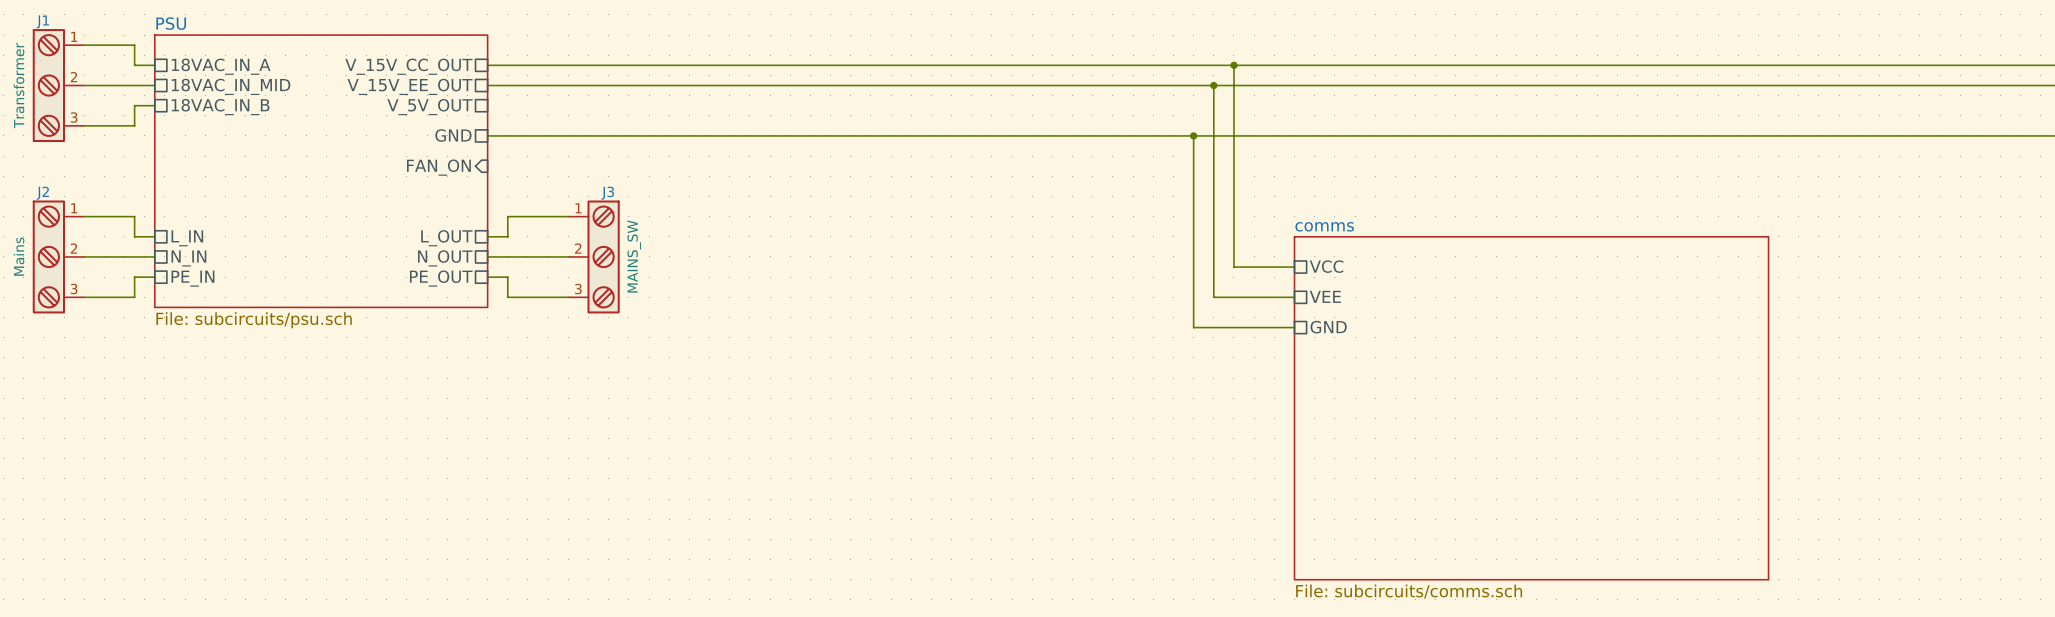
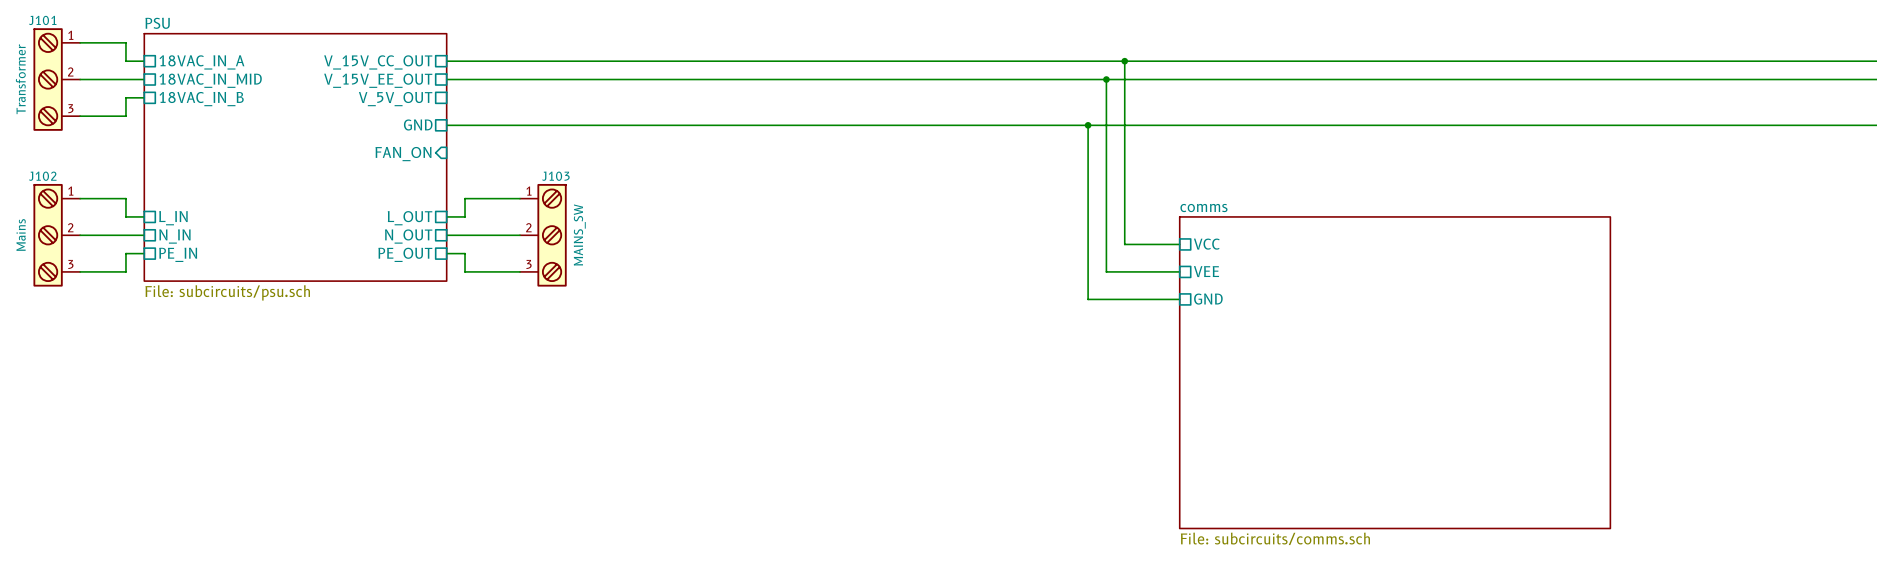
J1 name: J1 (42, 21) -> J101 (42, 20)
J2 name: J2 (42, 193) -> J102 (42, 176)
J3 name: J3 (607, 193) -> J103 (555, 176)

